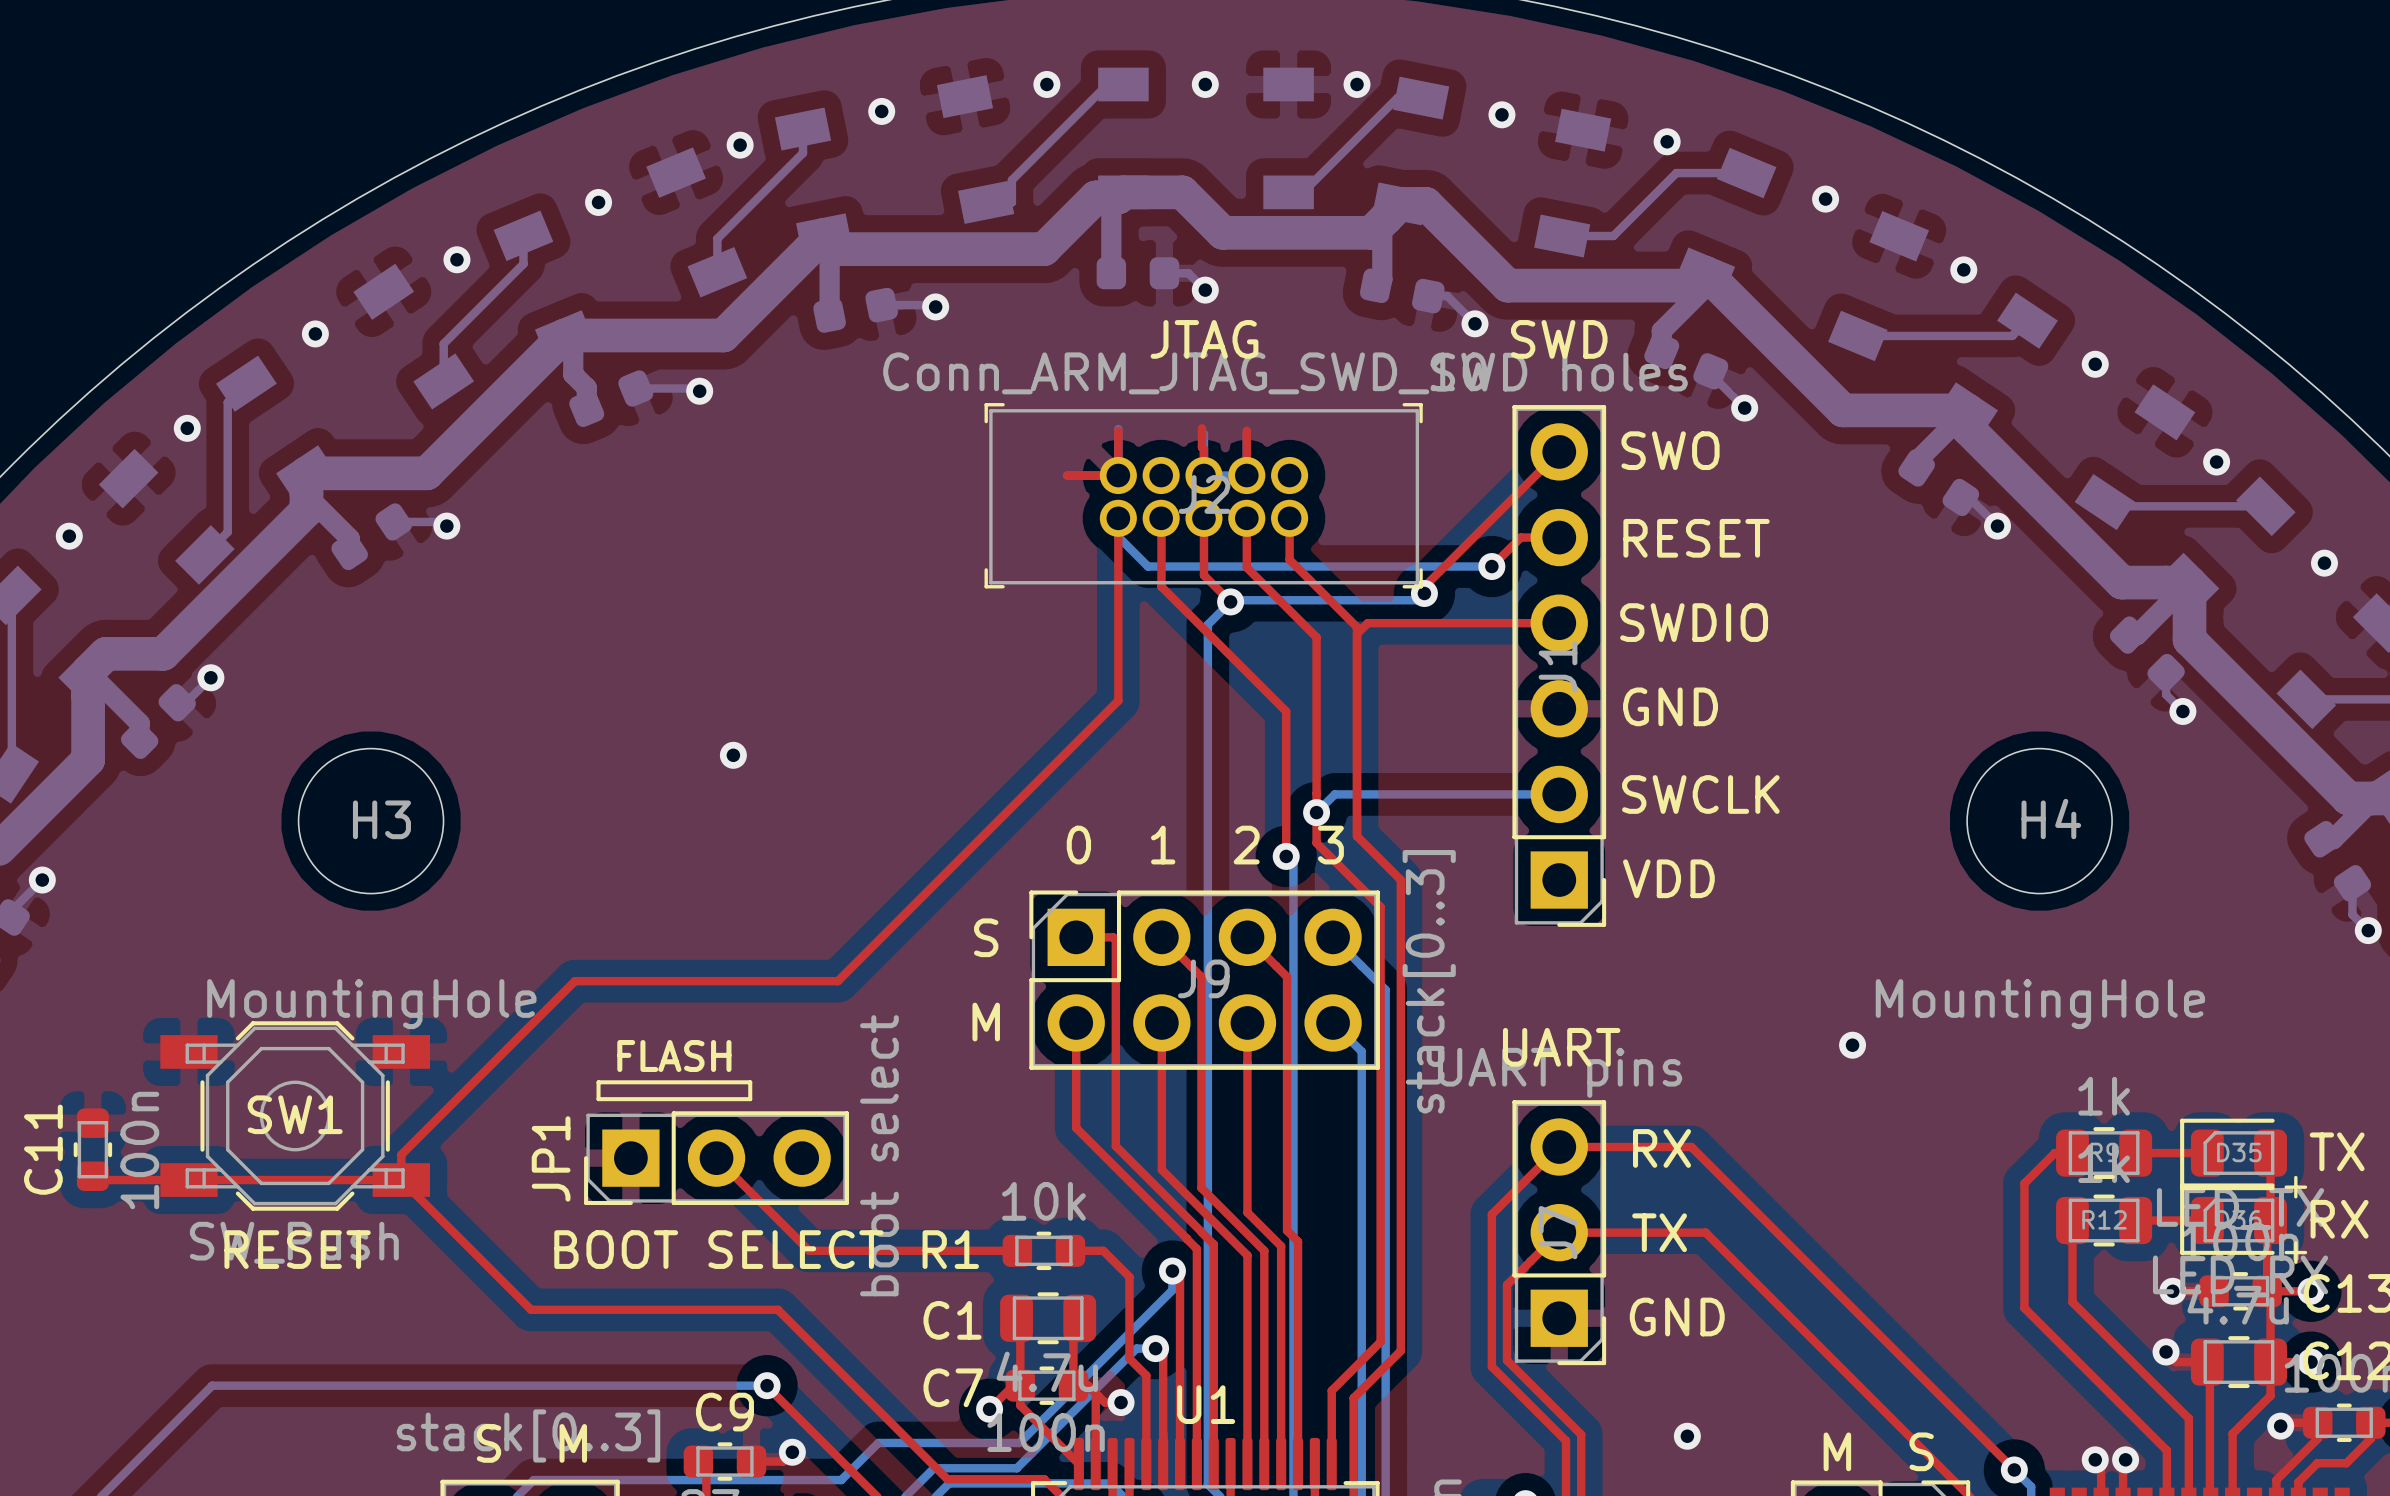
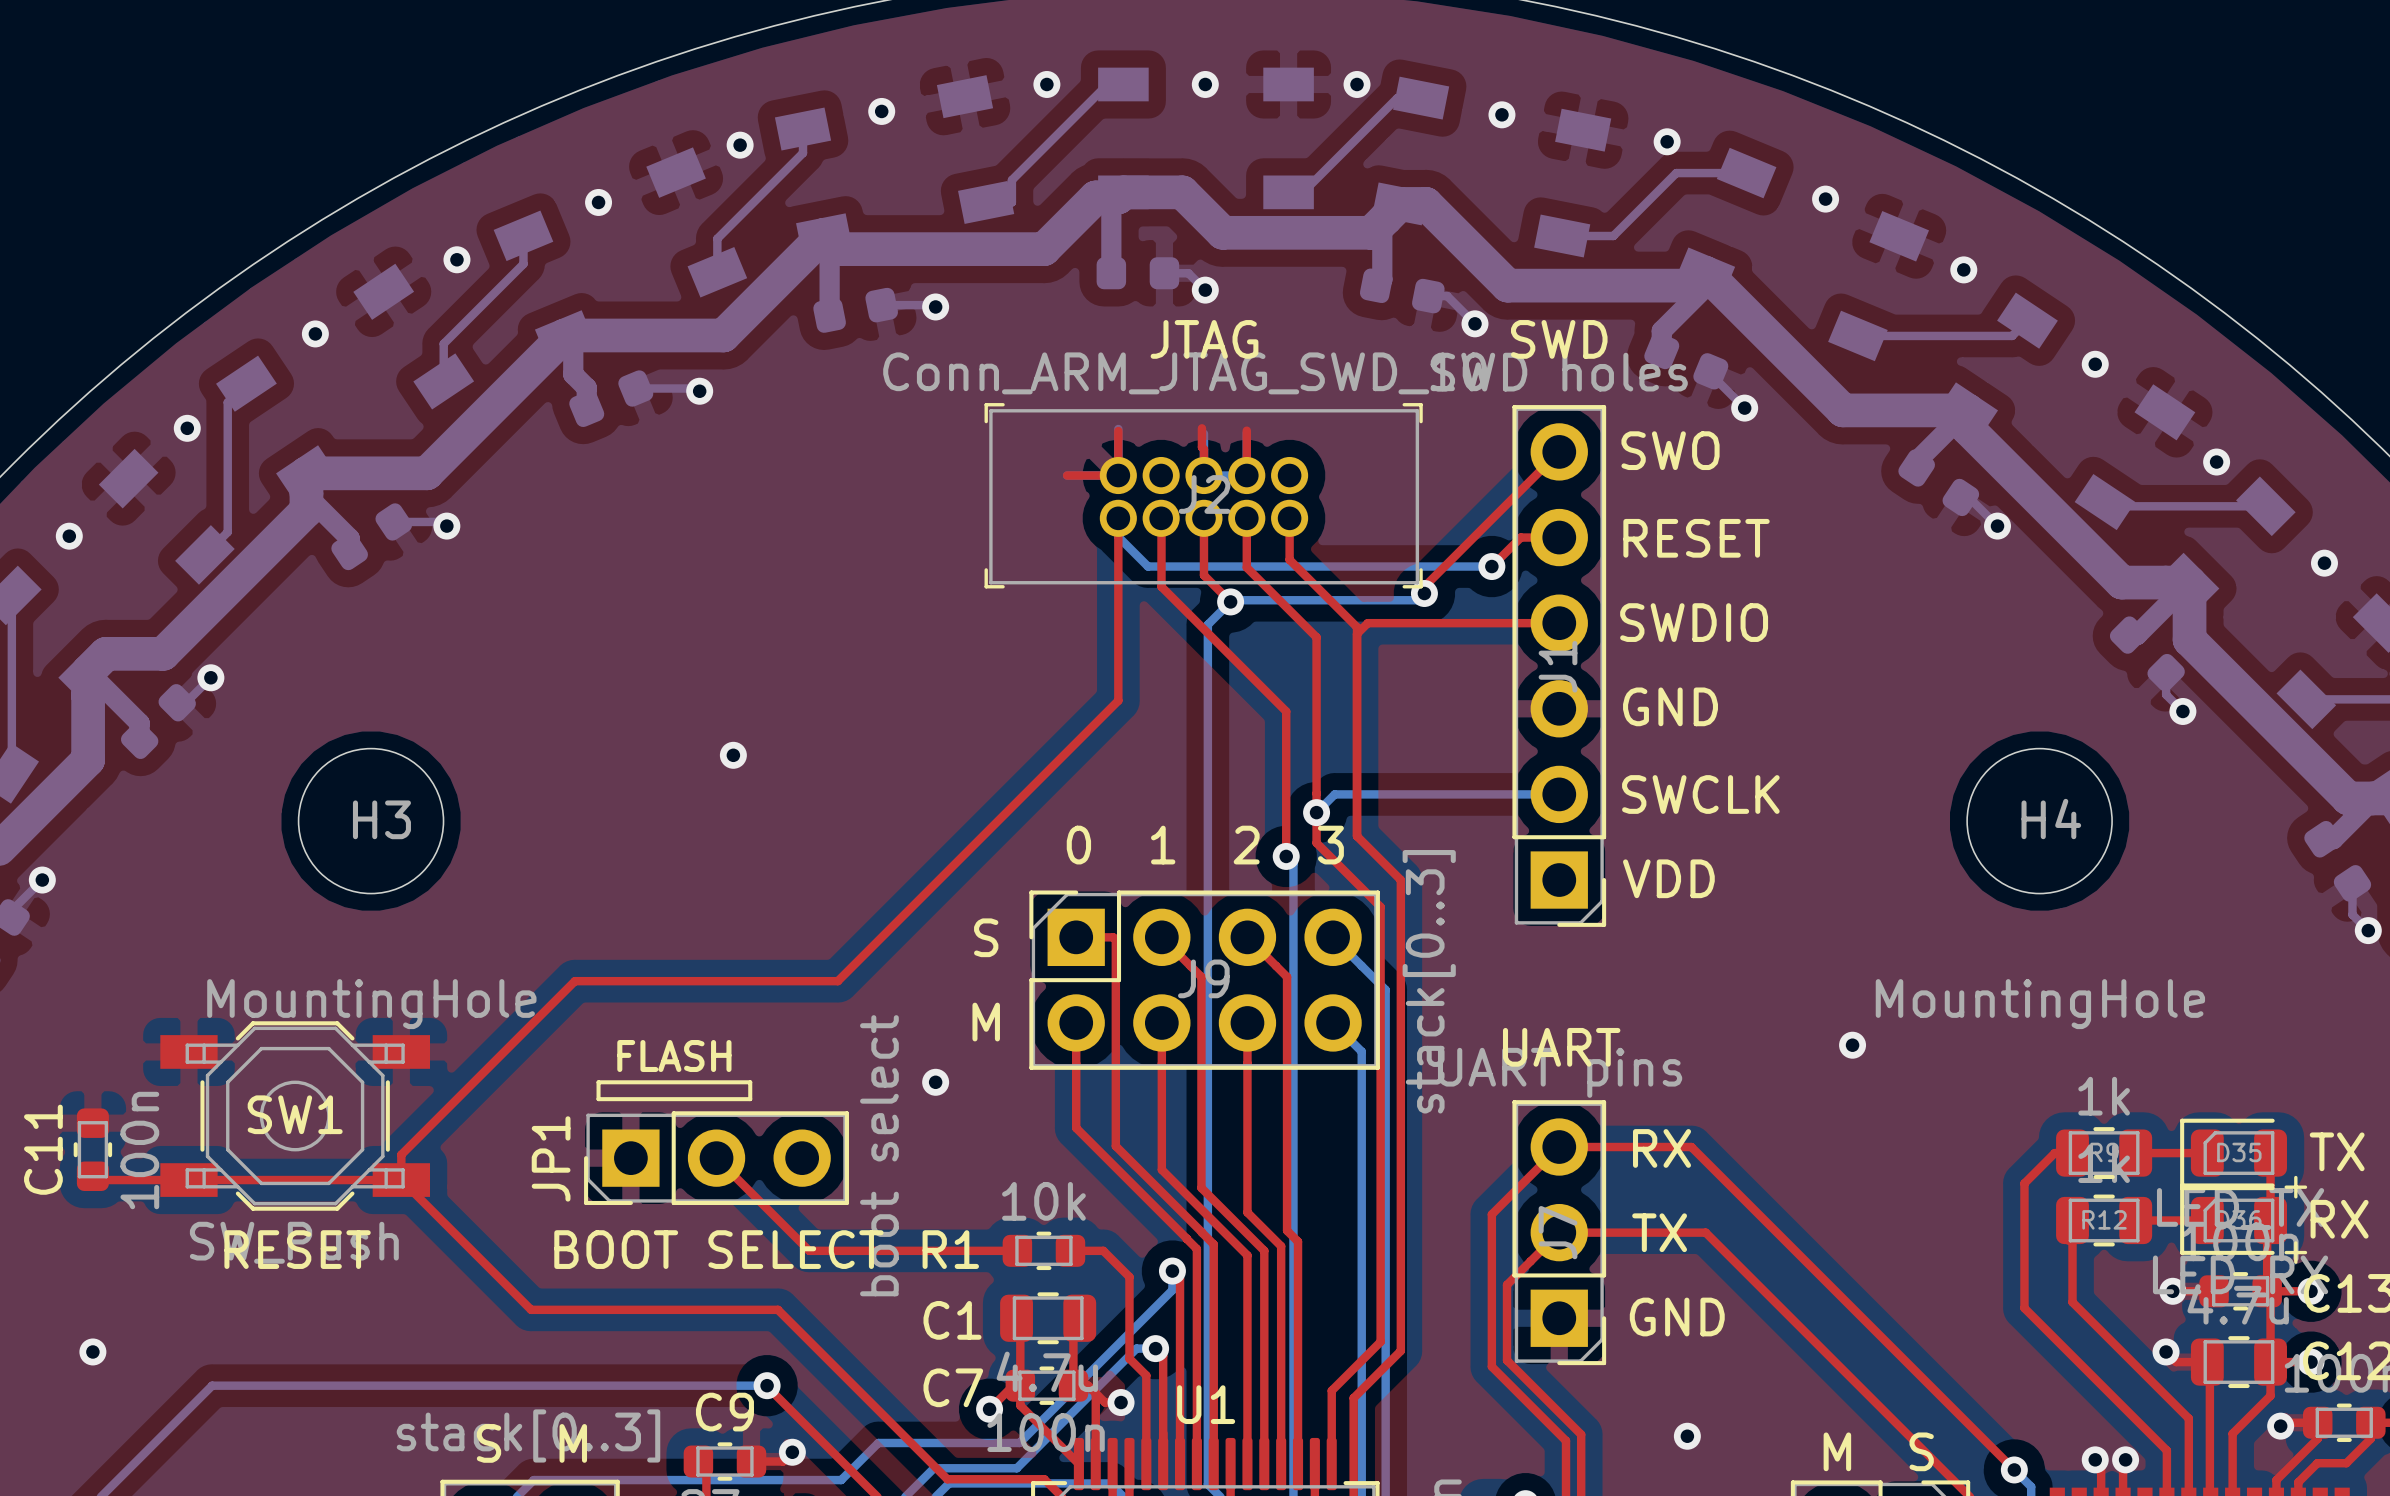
via: none -> (935, 1082)
via: none -> (92, 1351)

